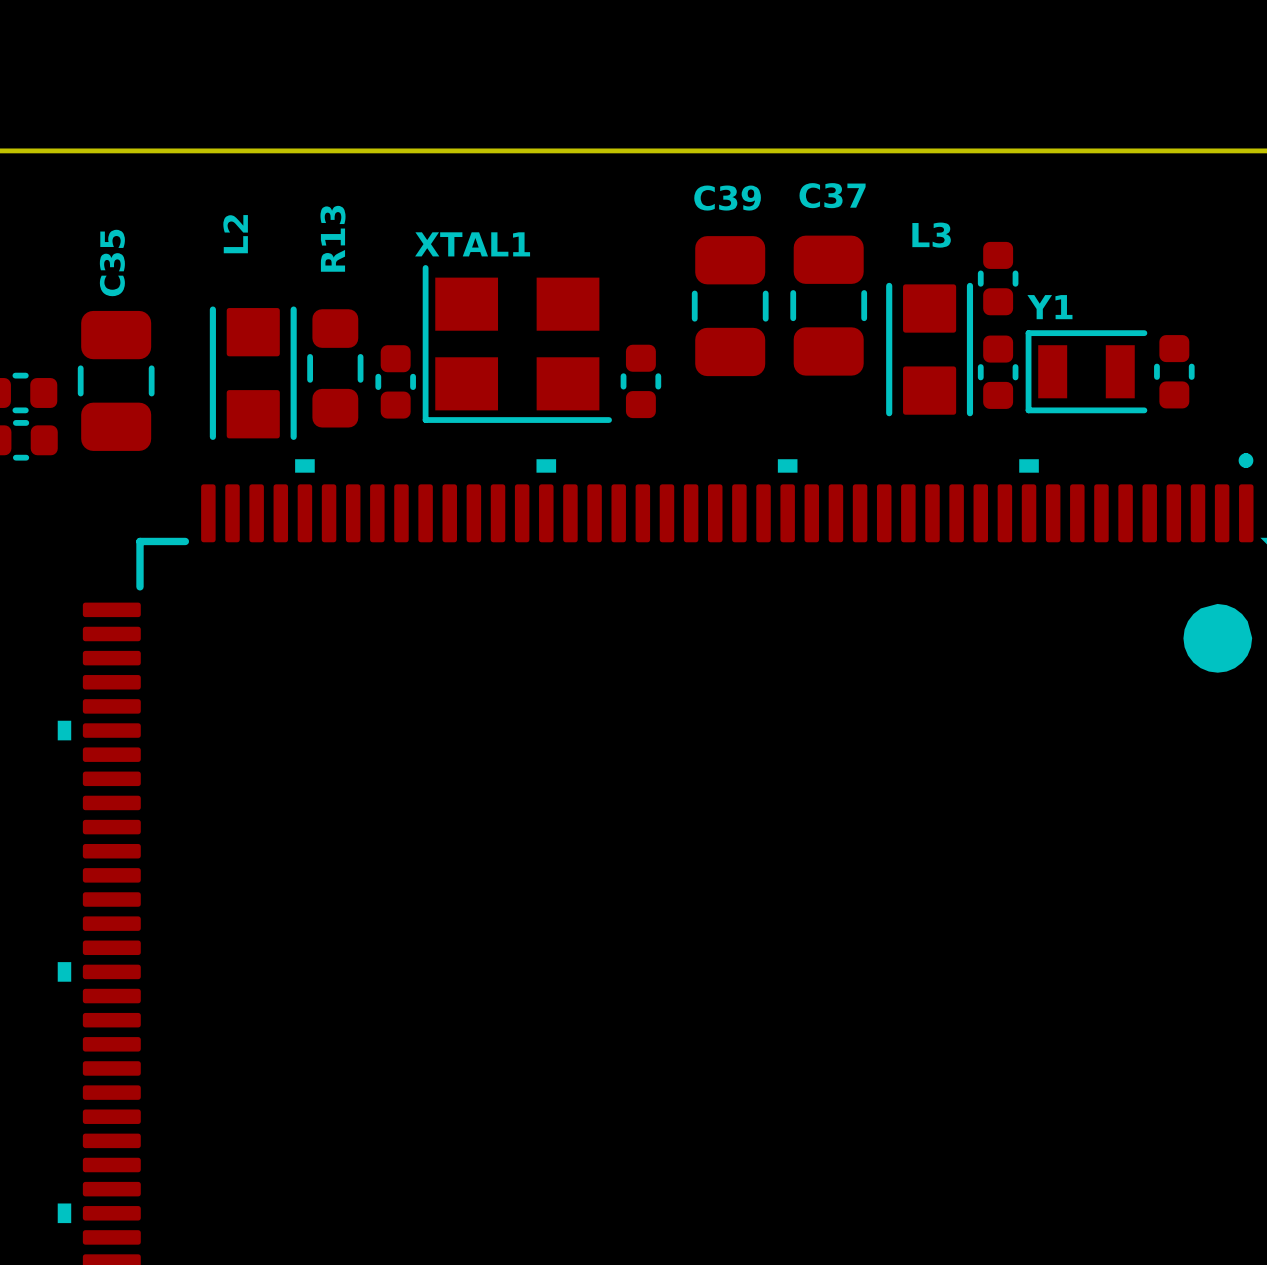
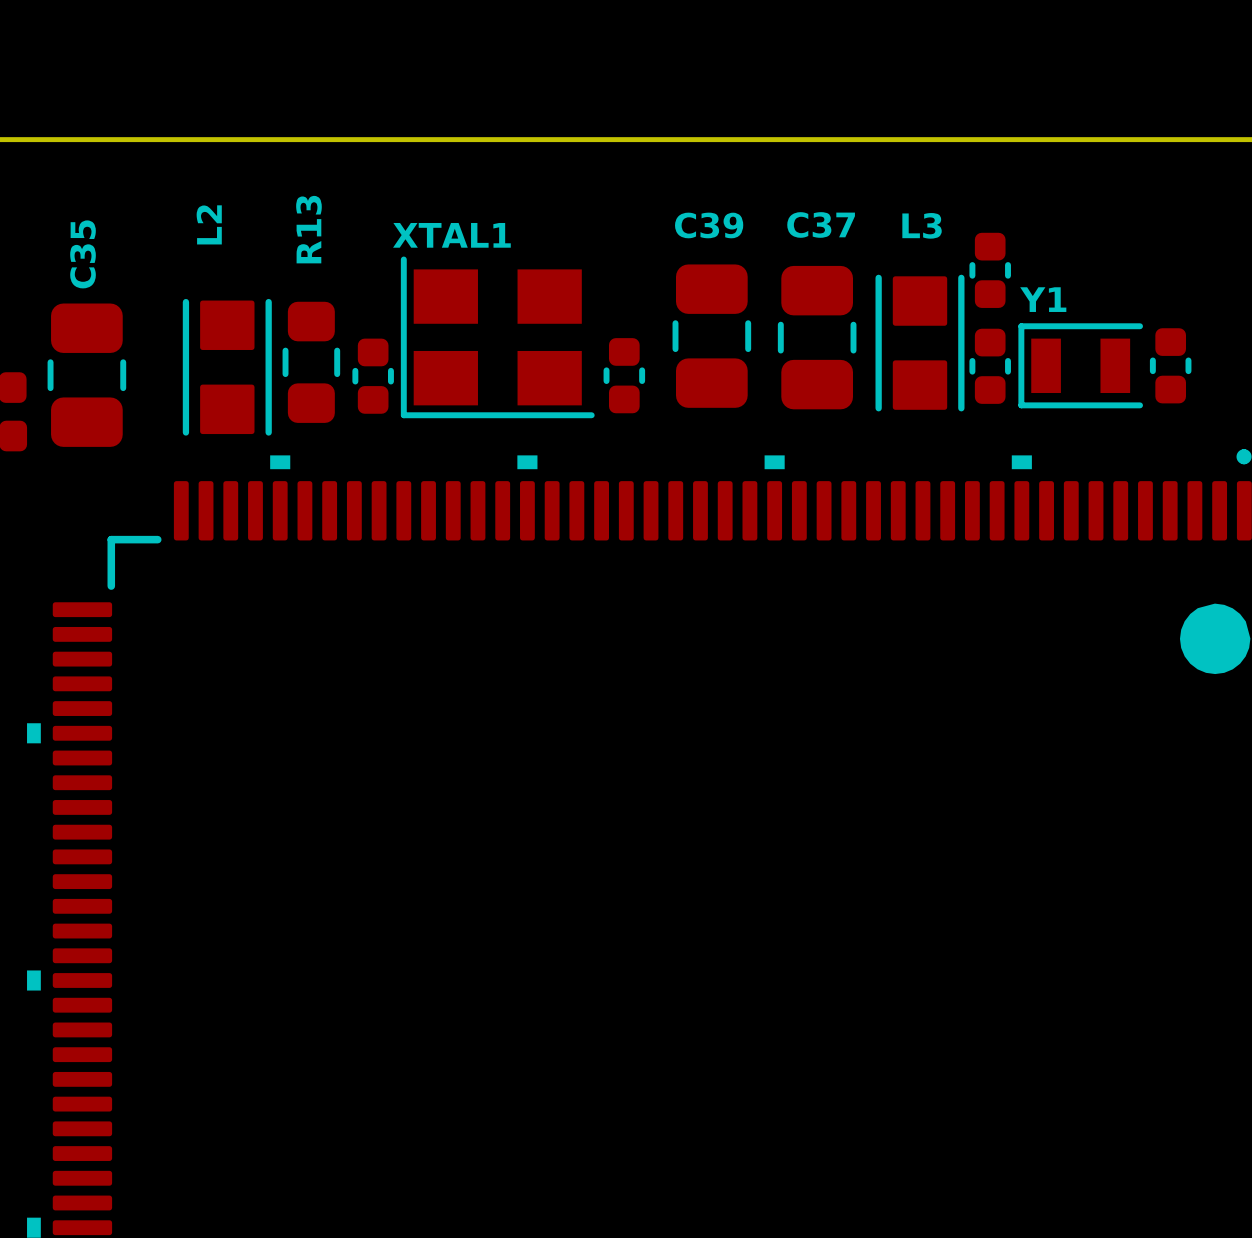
C37 position: (828, 305) -> (817, 337)
C39 position: (730, 306) -> (711, 336)

